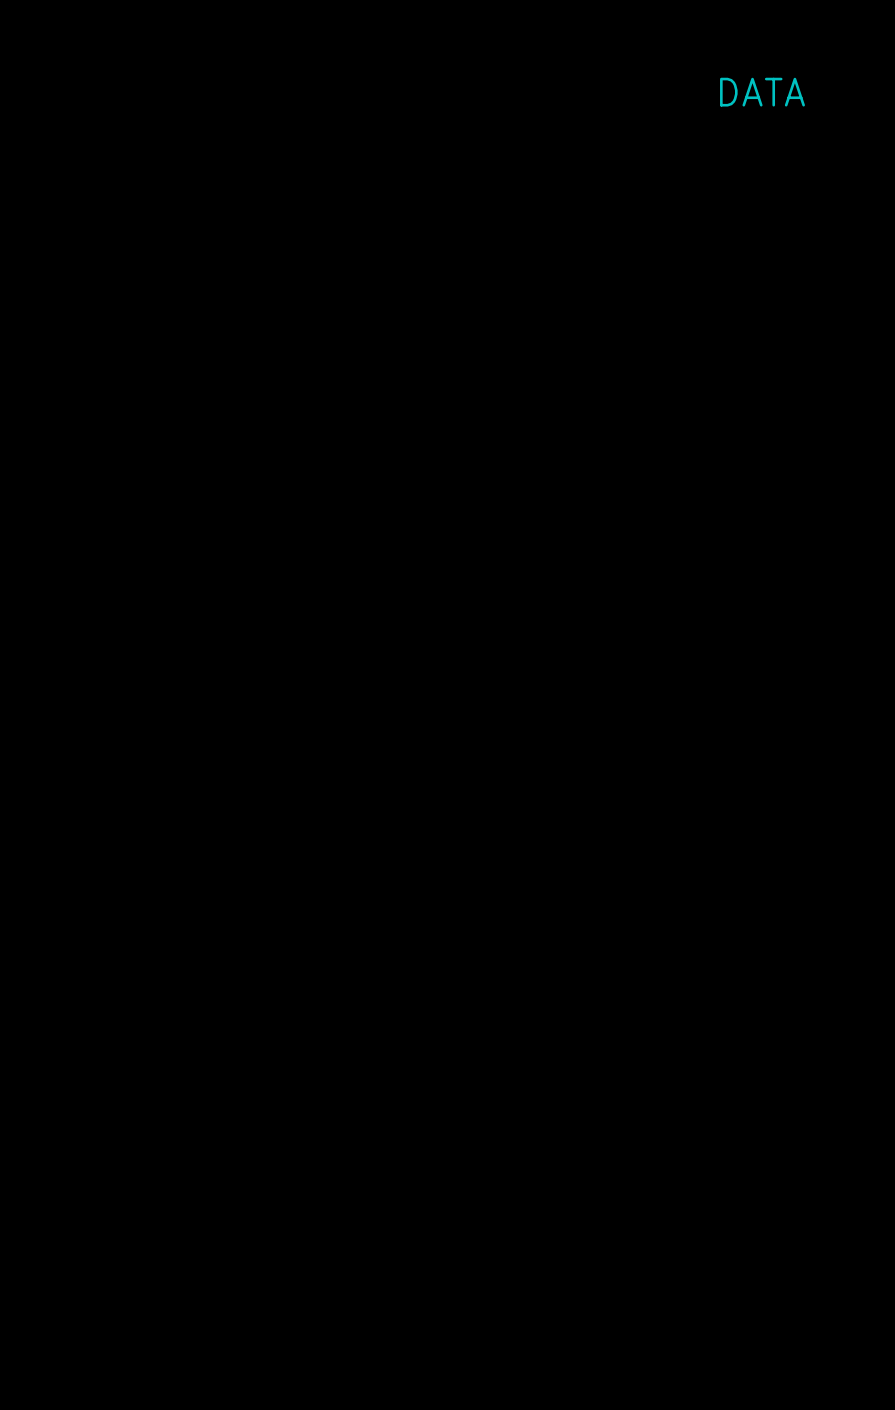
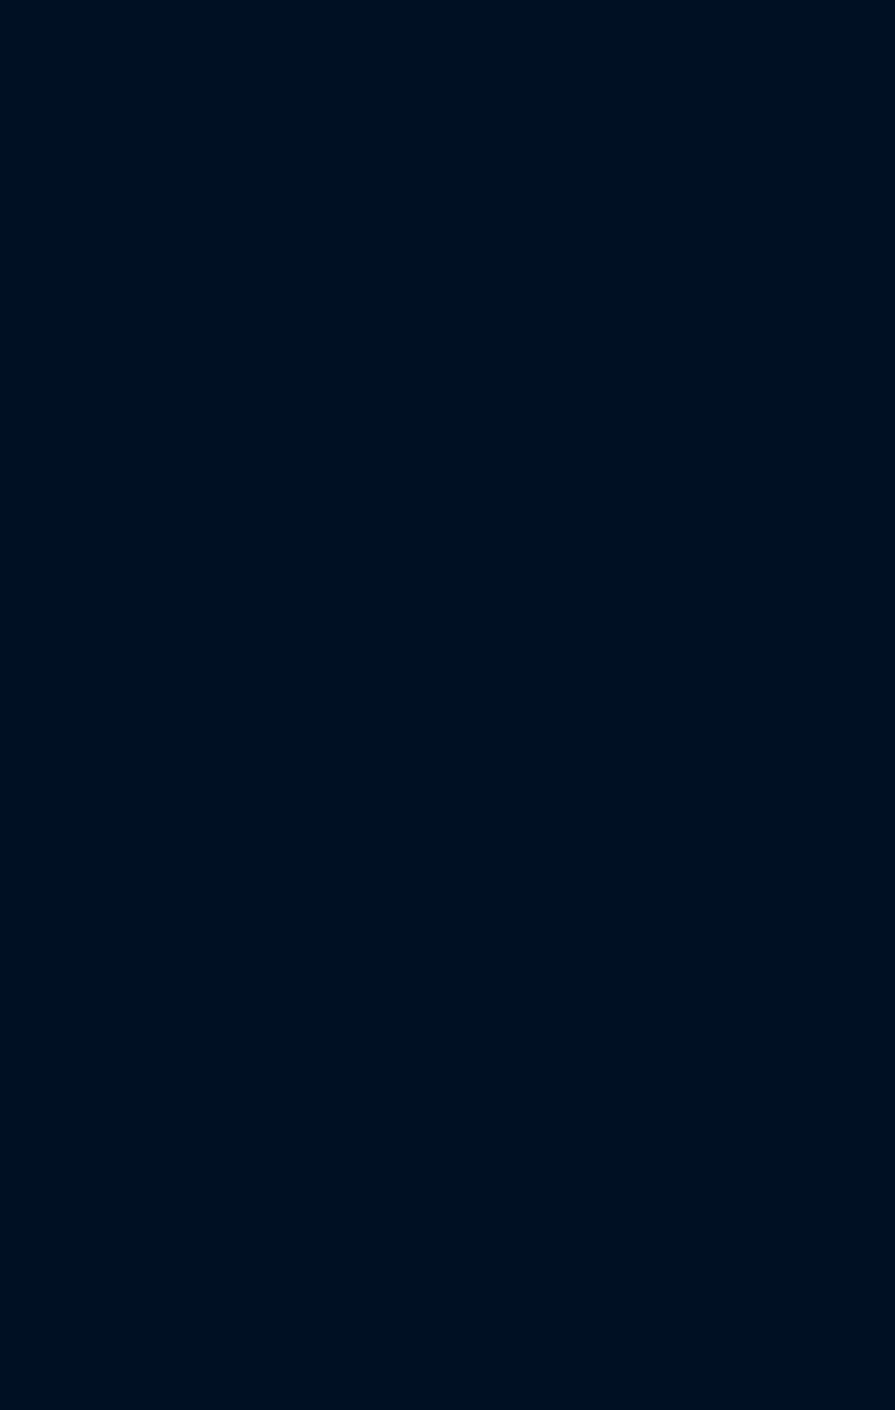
text: DATA (762, 92) -> none

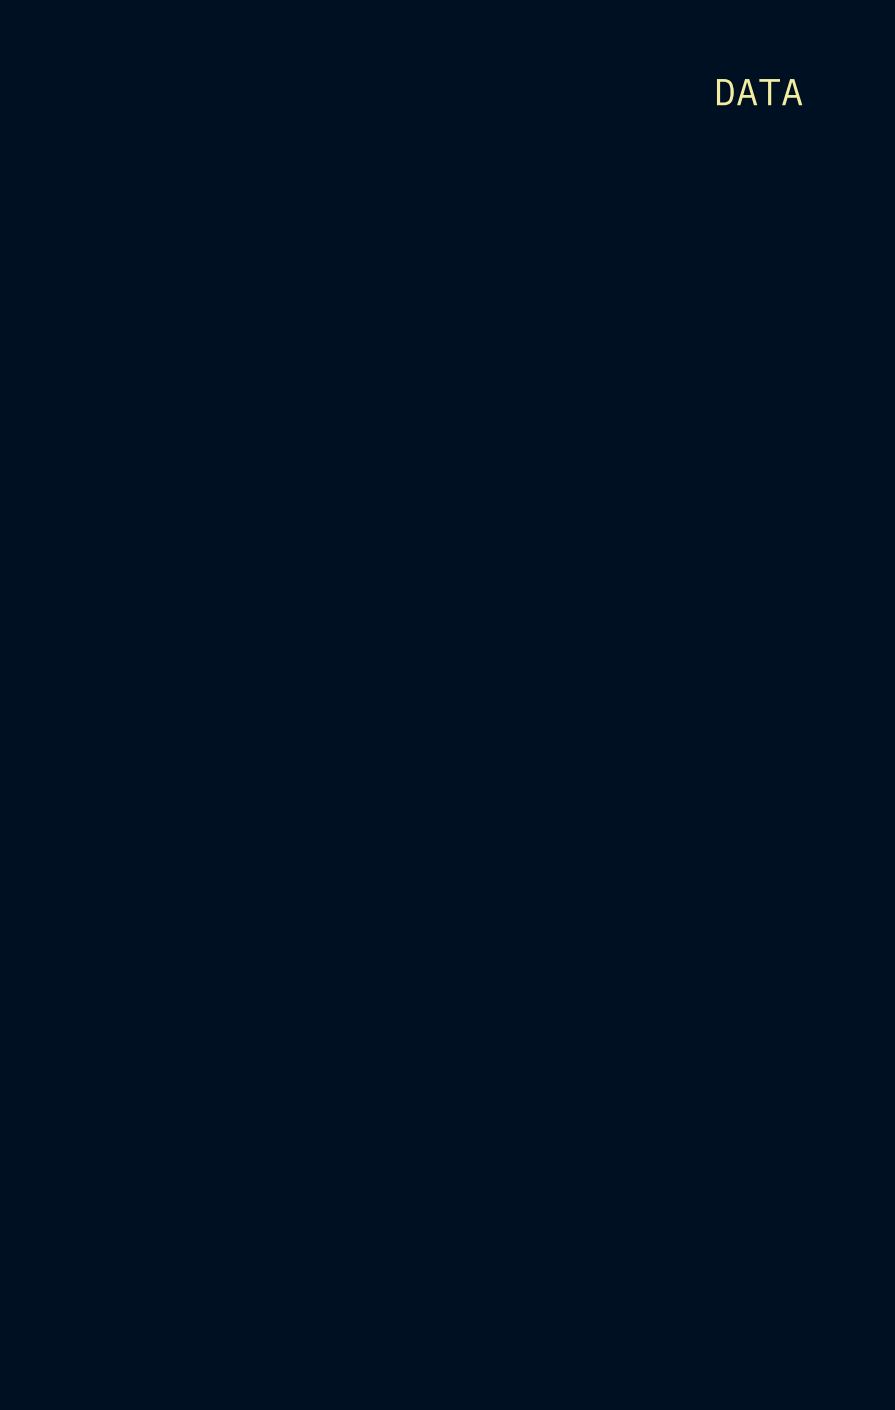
text: none -> DATA (759, 92)

